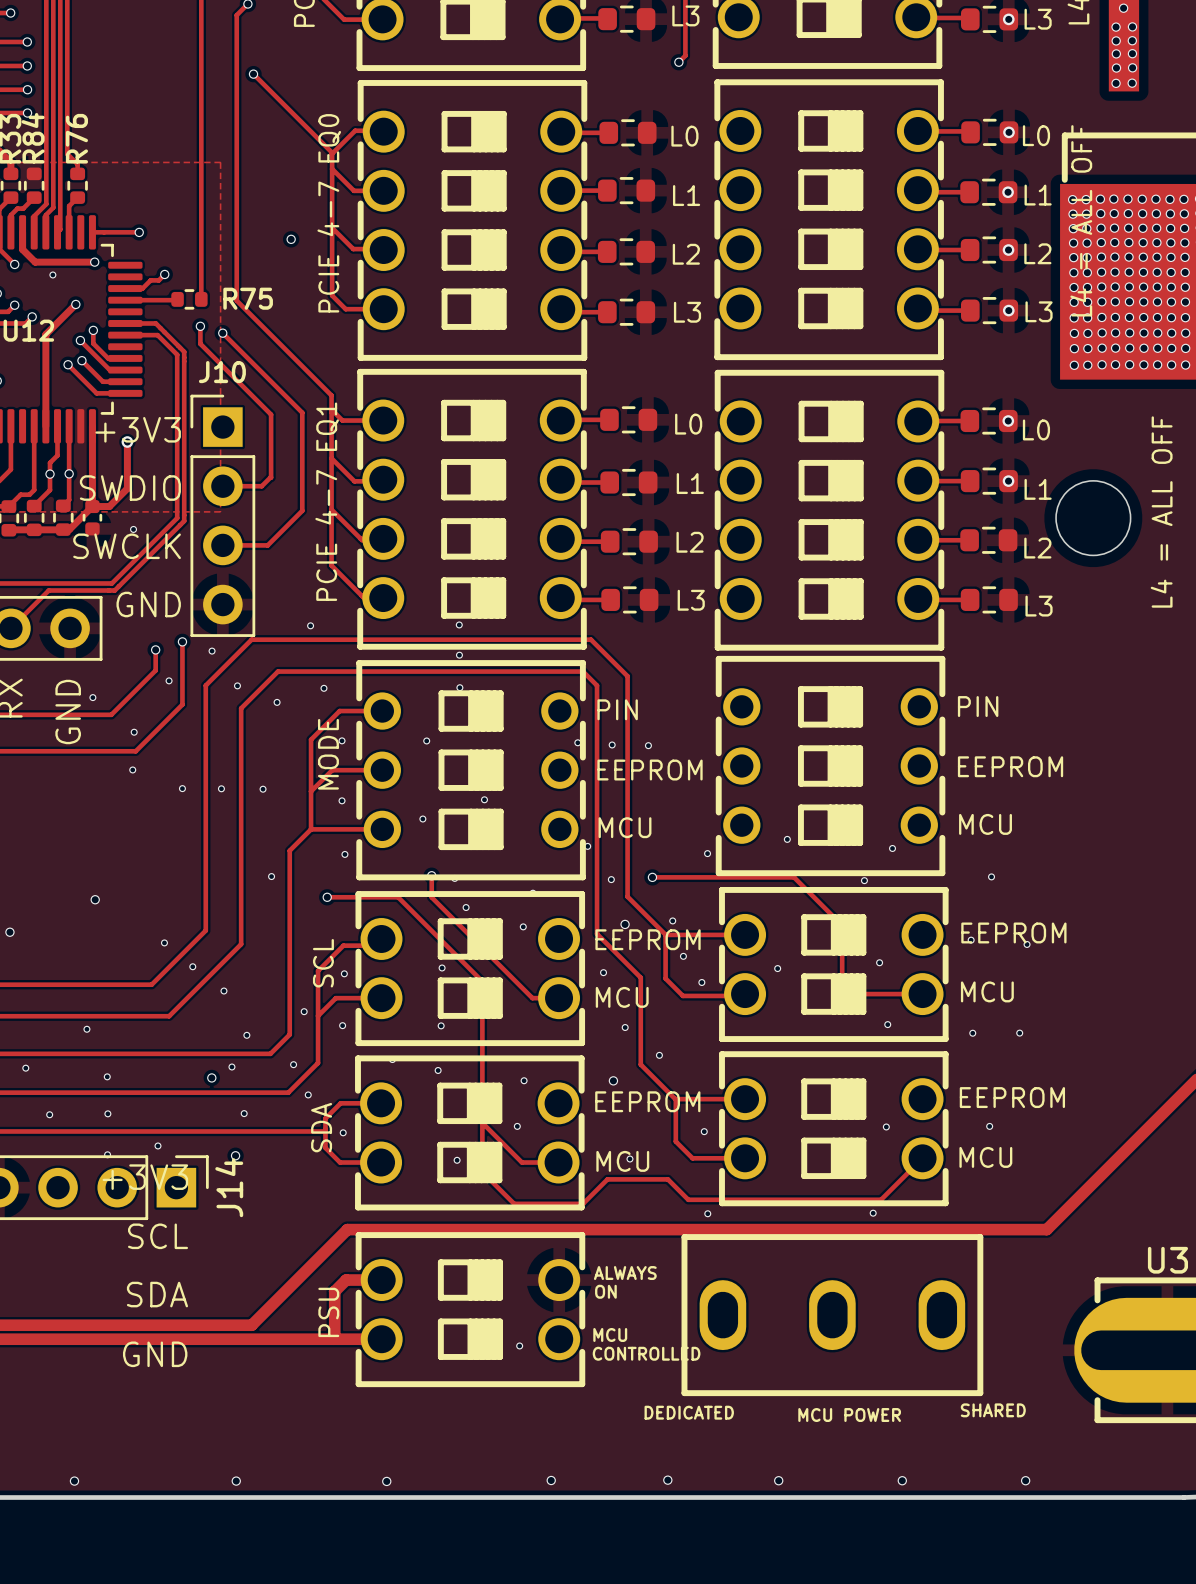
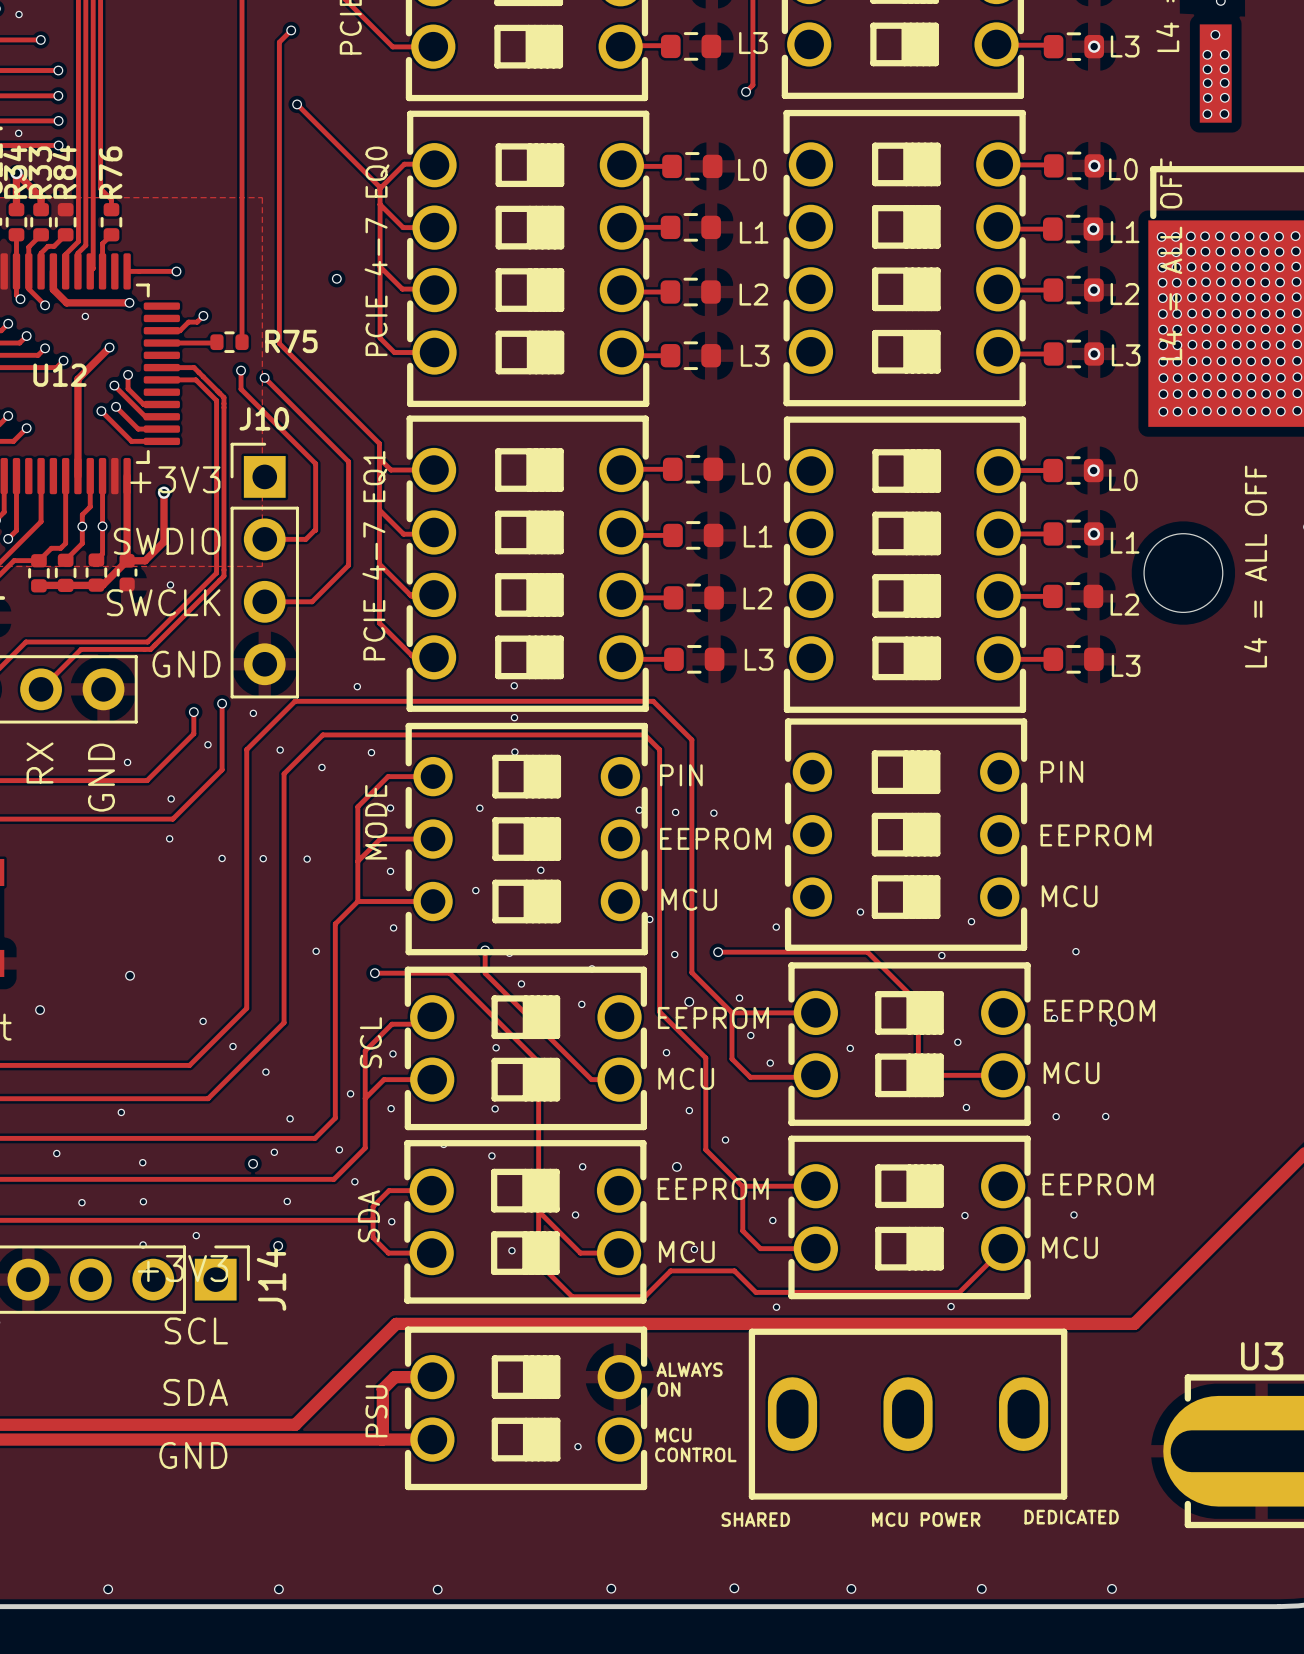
text: CONTROLLED (646, 1353) -> CONTROL (695, 1454)
text position: SHARED (993, 1410) -> SHARED (755, 1519)
text position: DEDICATED (689, 1412) -> DEDICATED (1071, 1517)

